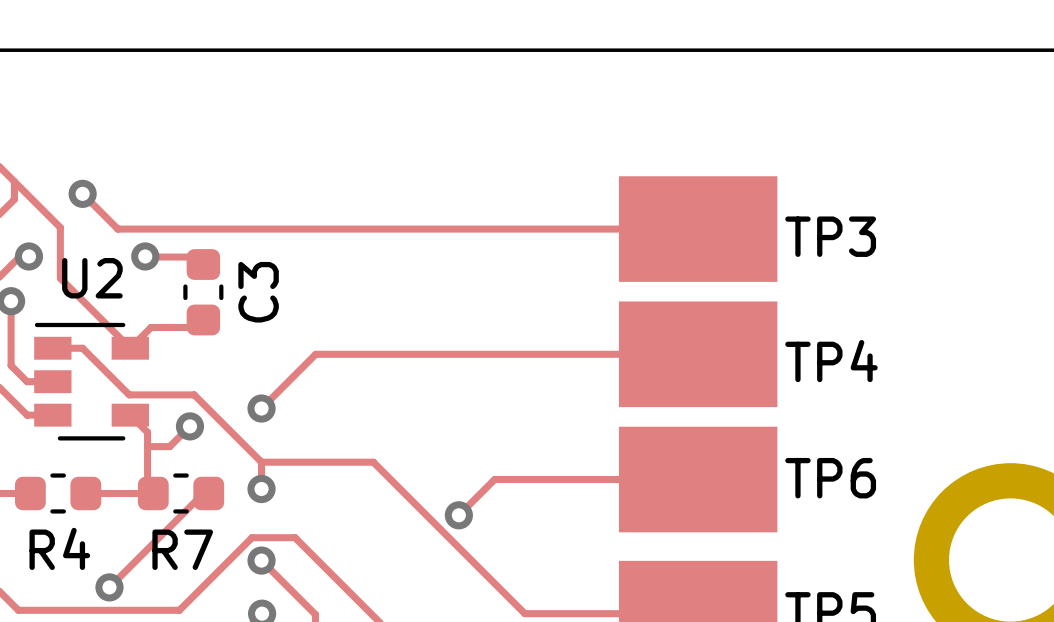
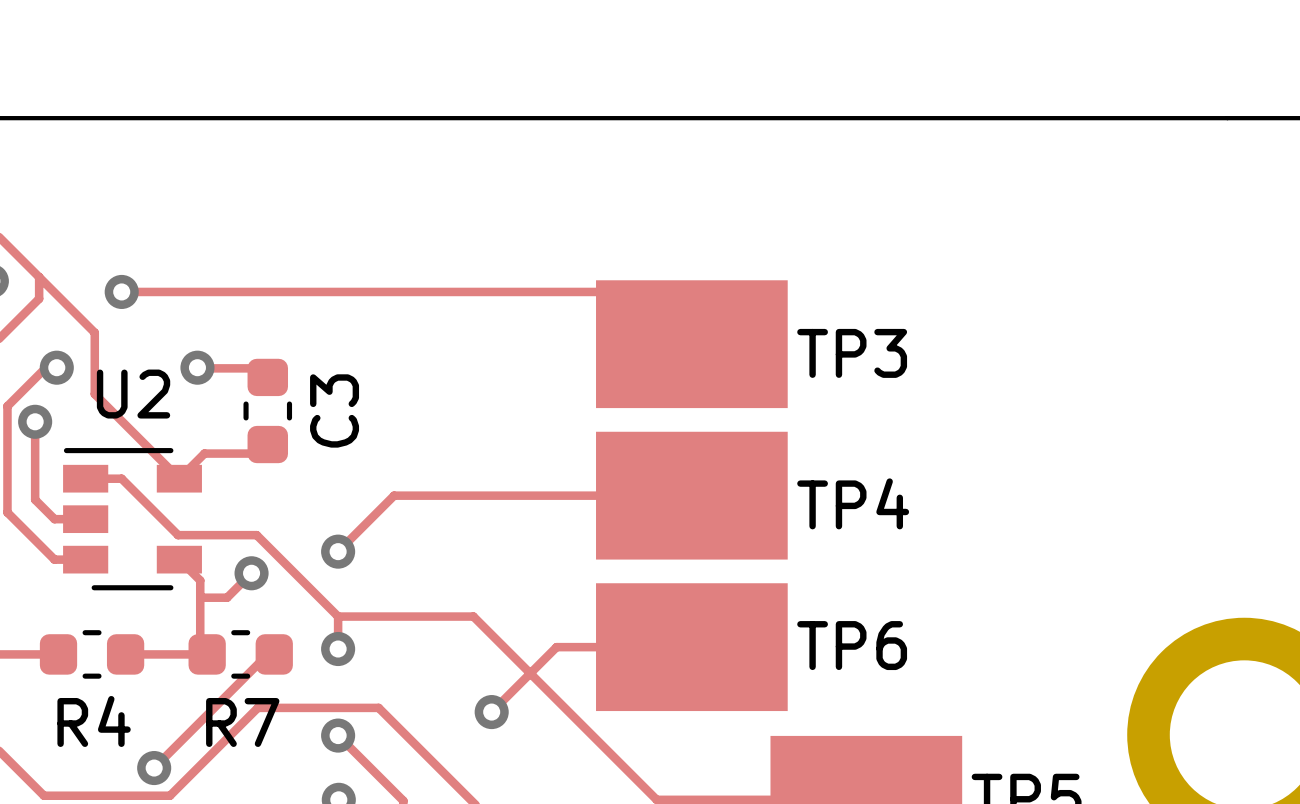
track: (82, 193) (117, 229) (698, 229) -> (121, 291) (639, 291) (691, 344)
TP3 position: (698, 229) -> (691, 344)
track: (698, 354) (315, 354) (307, 362) -> (691, 495) (394, 495)
TP4 position: (698, 354) -> (691, 495)
track: (698, 479) (494, 479) (458, 515) -> none
TP6 position: (698, 479) -> (691, 647)
track: none -> (691, 647) (556, 647) (491, 712)
via position: (458, 515) -> (491, 712)
track: (252, 537) (179, 610) (122, 610) -> (326, 707) (257, 707) (169, 795)

